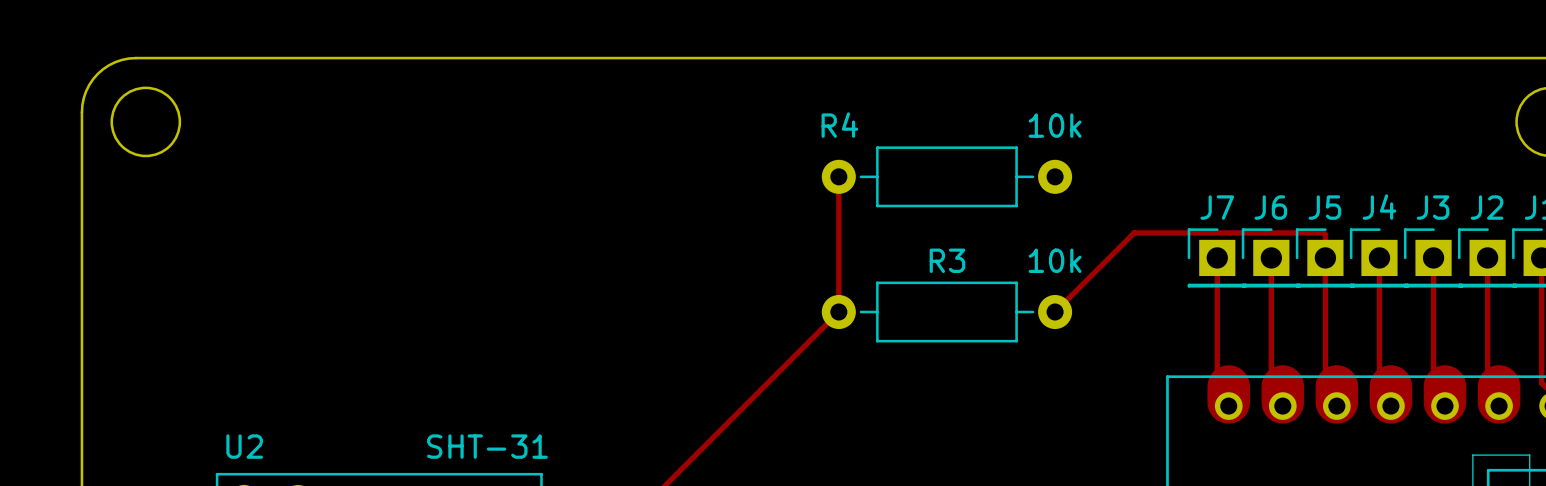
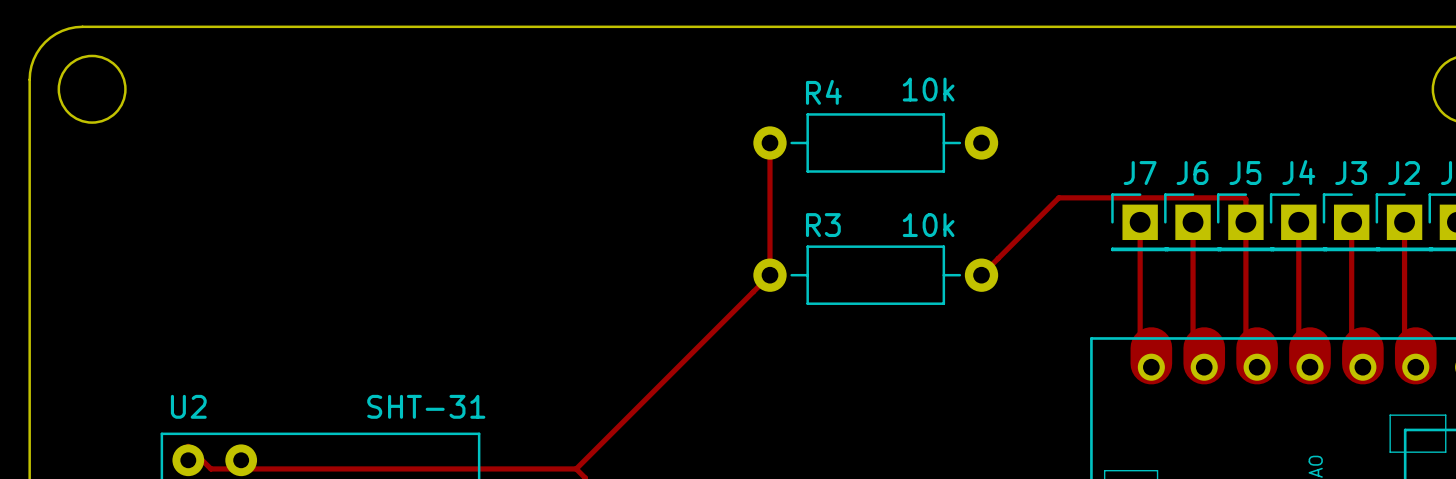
R4 name position: R4 (839, 125) -> R4 (823, 92)
text position: 10k (1055, 125) -> 10k (928, 89)
R3 name position: R3 (947, 260) -> R3 (823, 225)
text position: 10k (1055, 260) -> 10k (928, 225)

